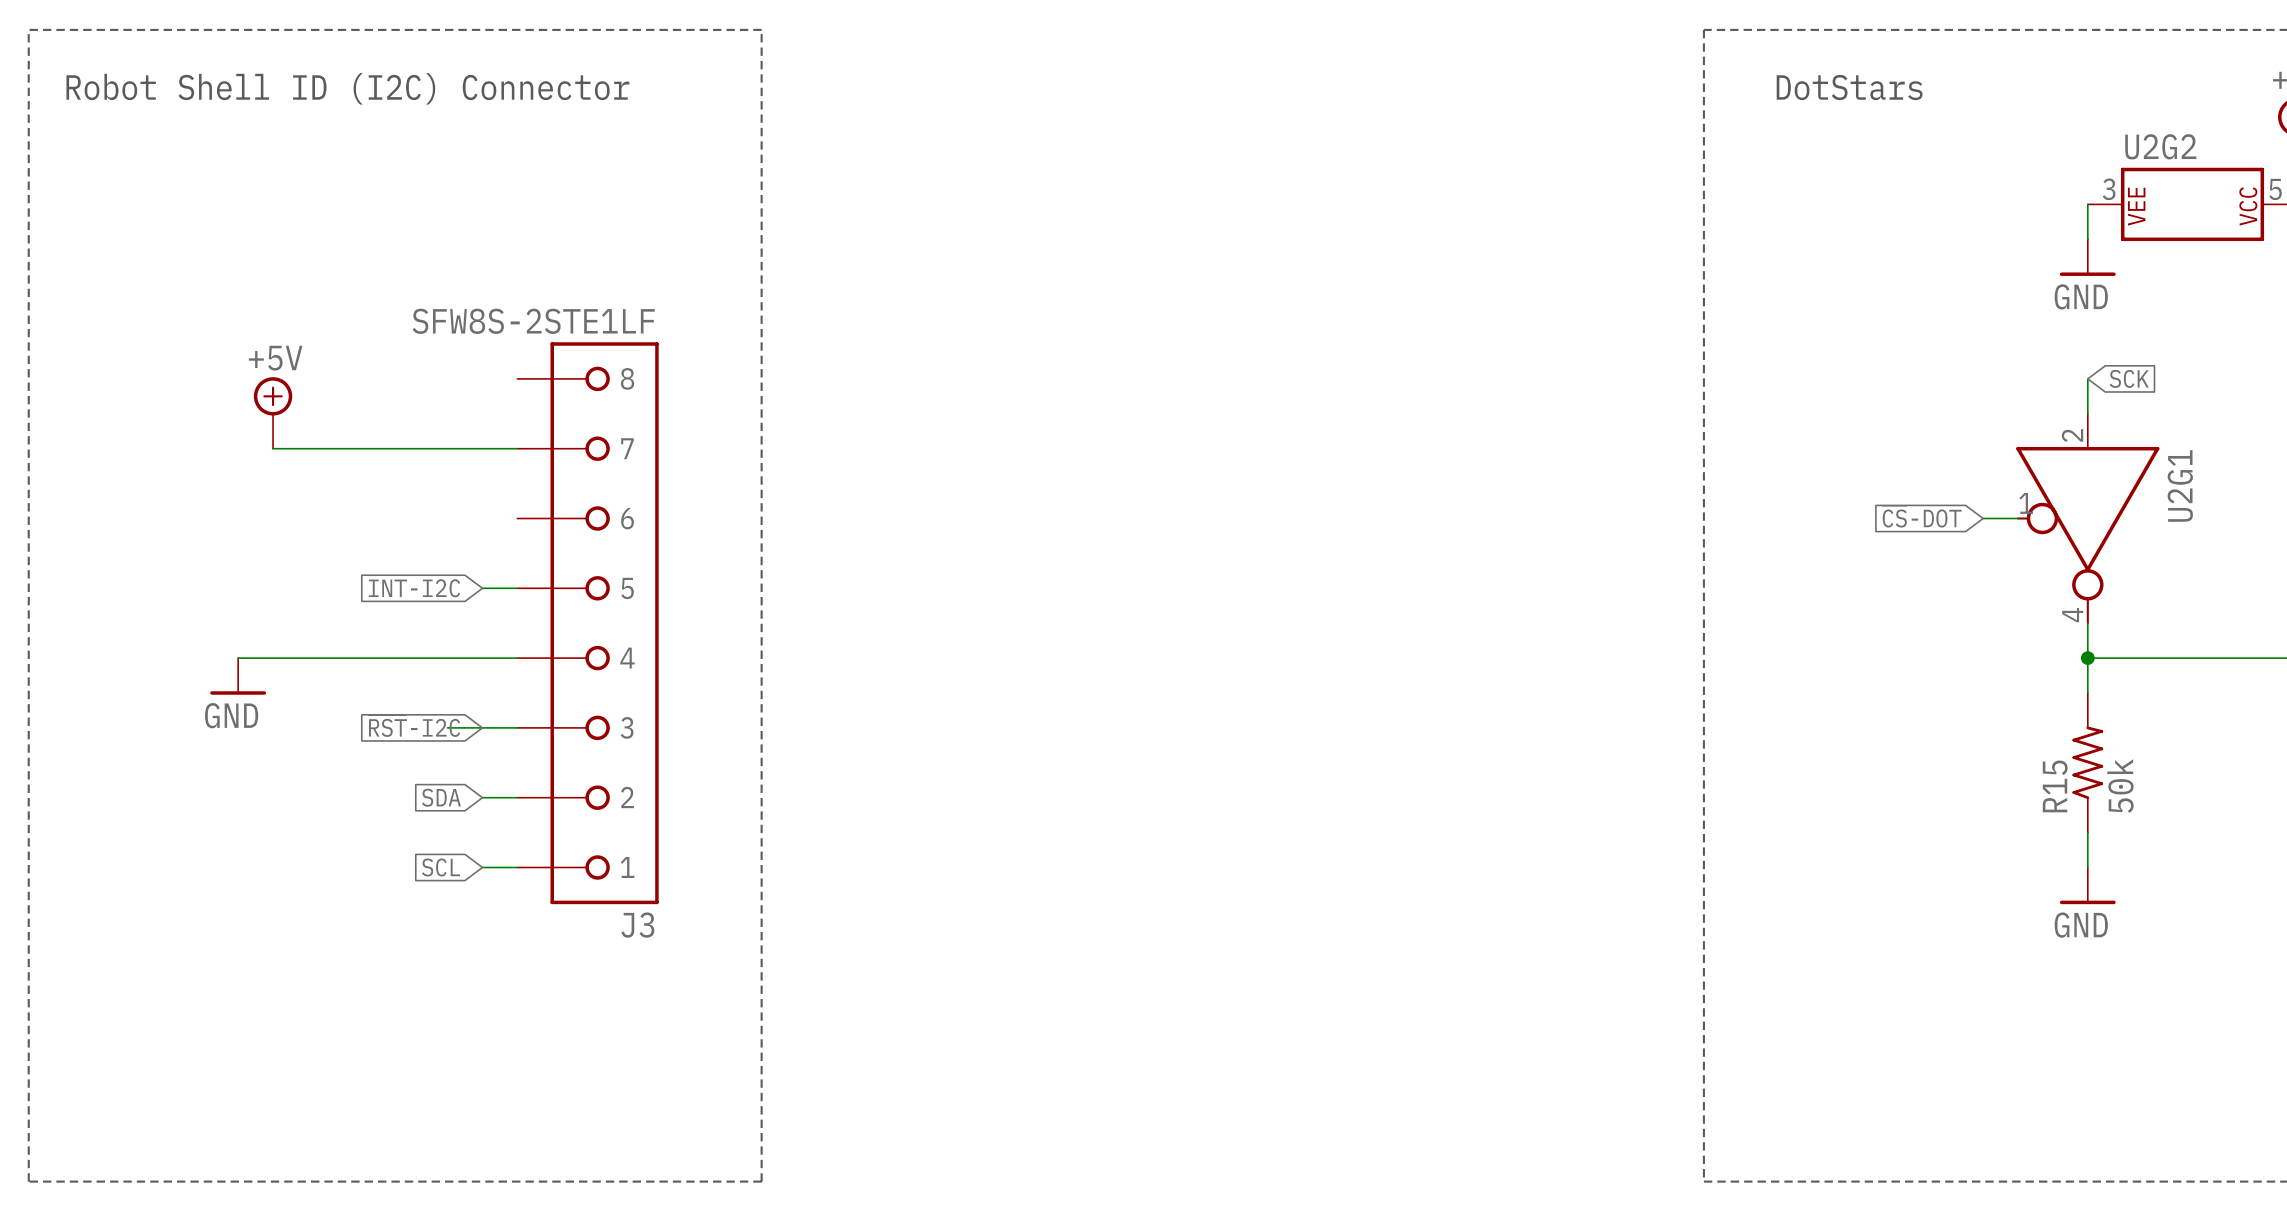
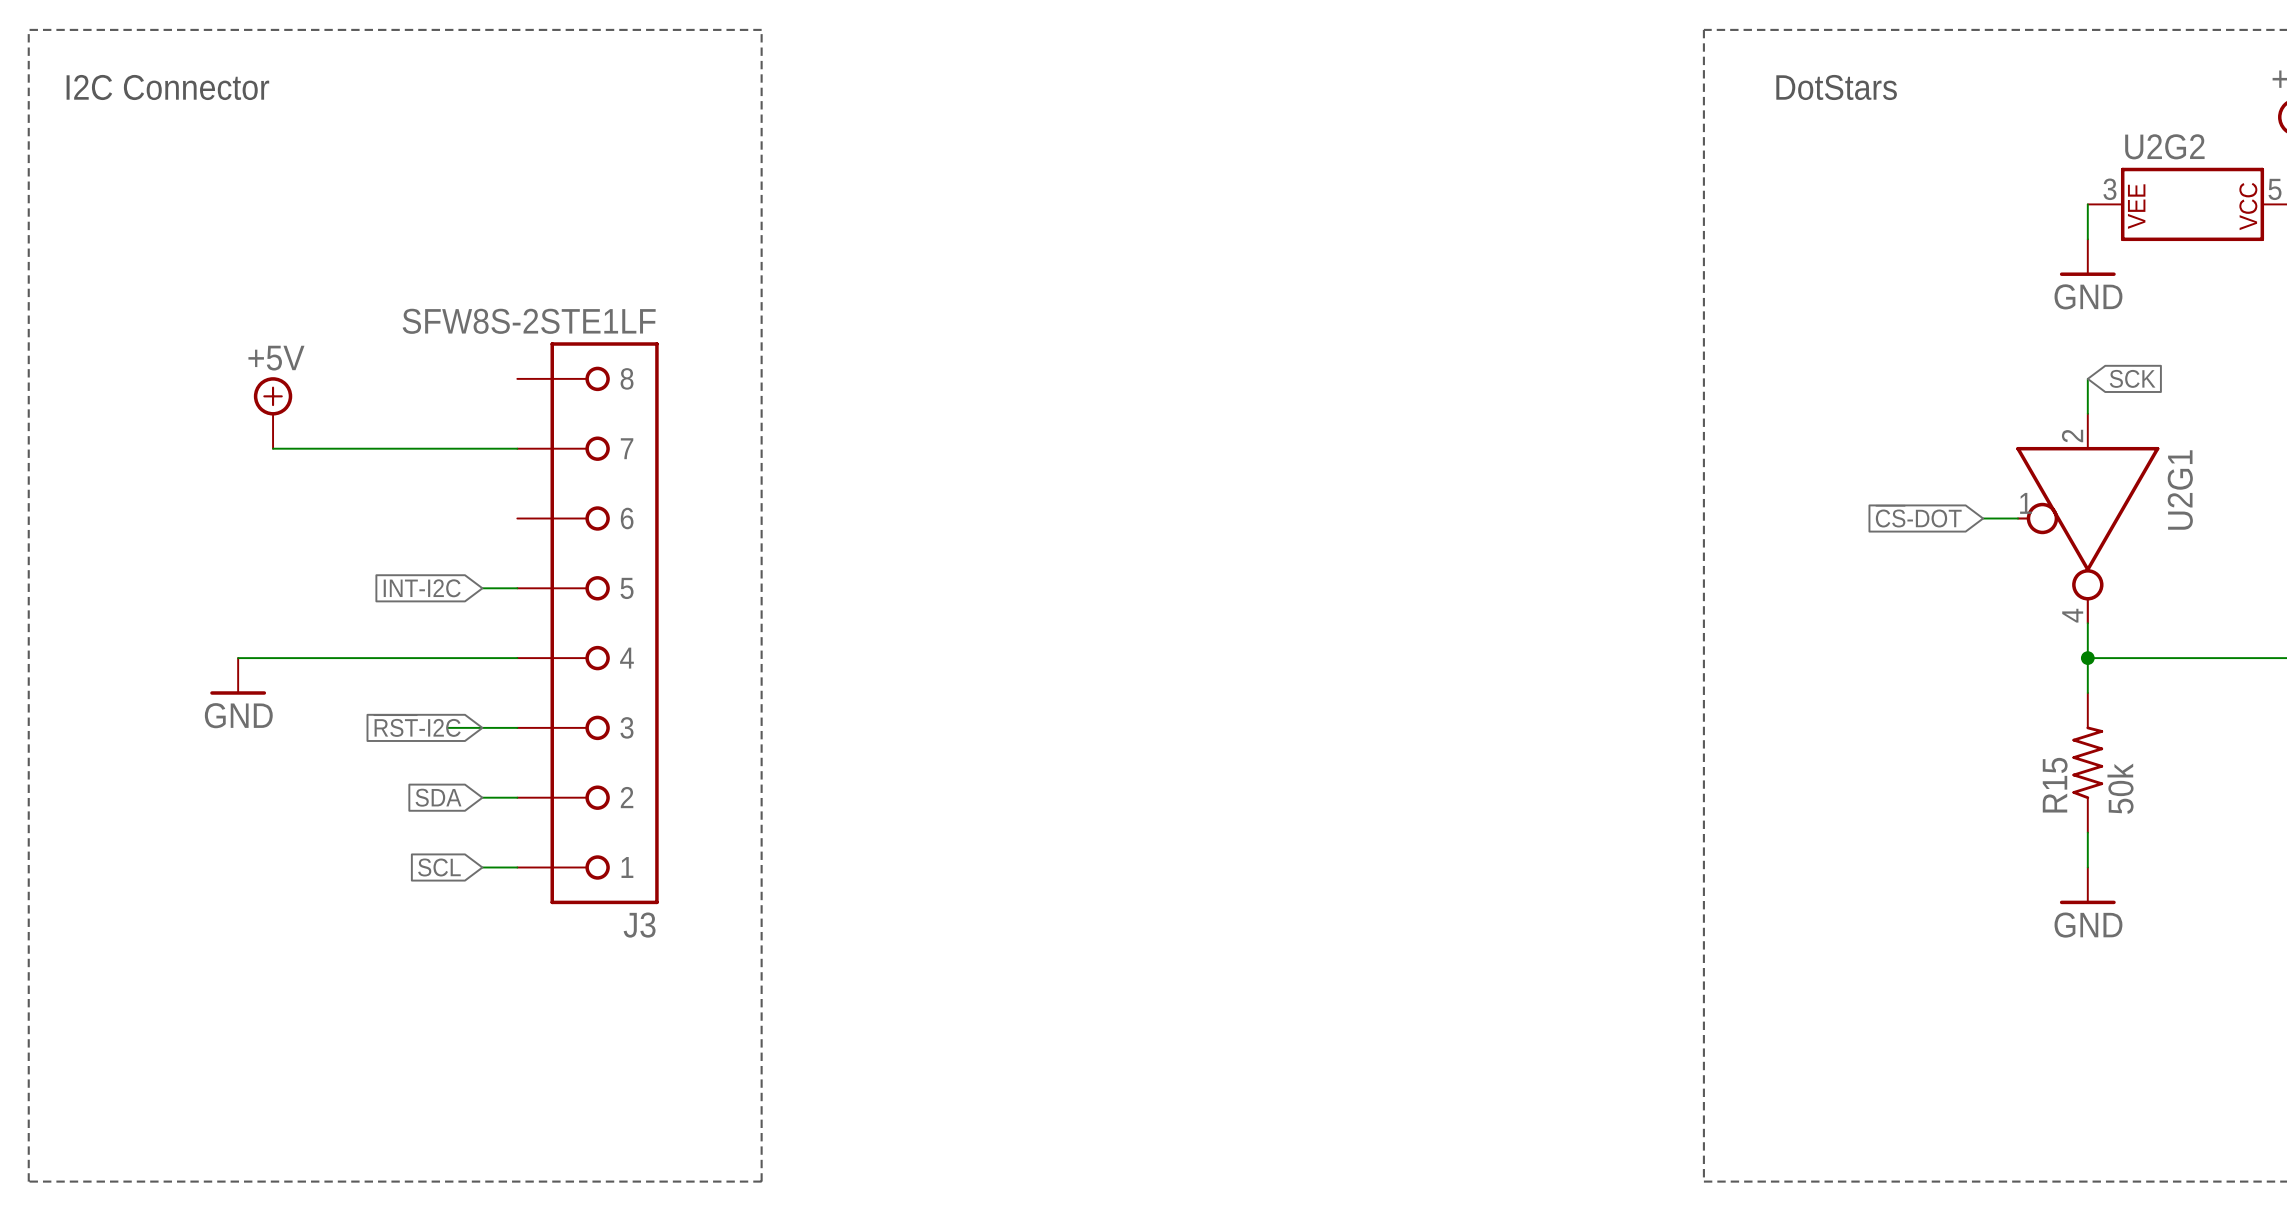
text: Robot Shell ID (I2C) Connector (347, 88) -> I2C Connector (167, 87)

